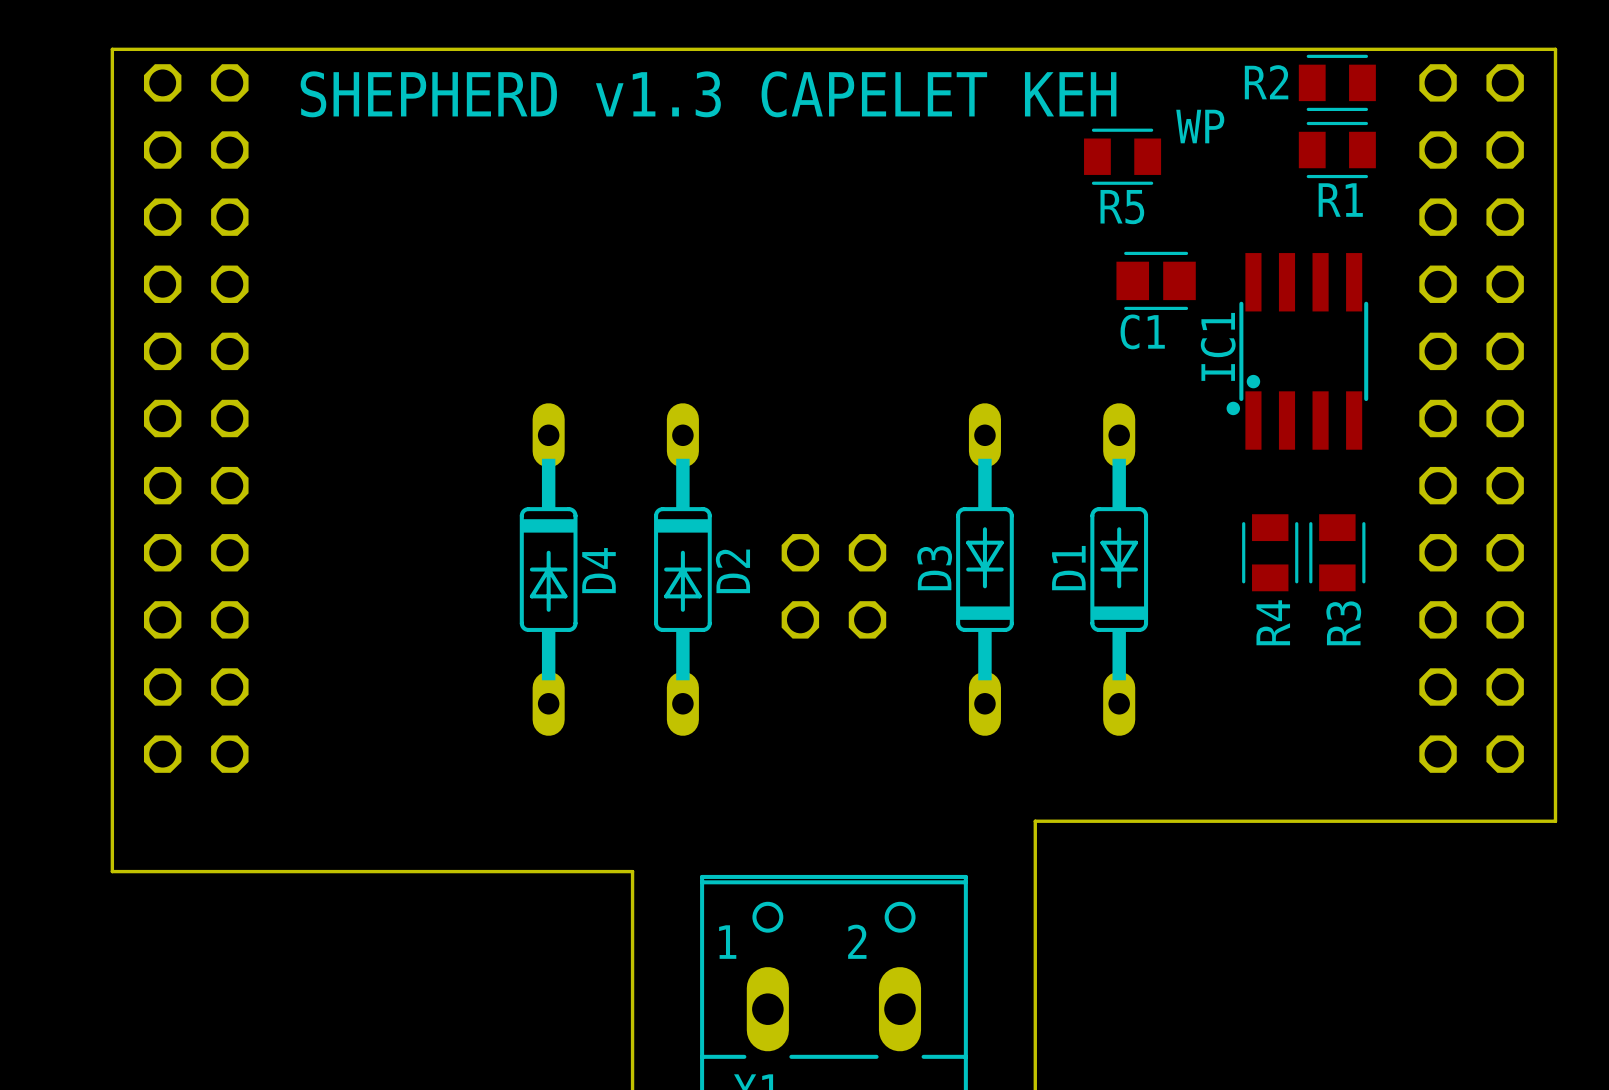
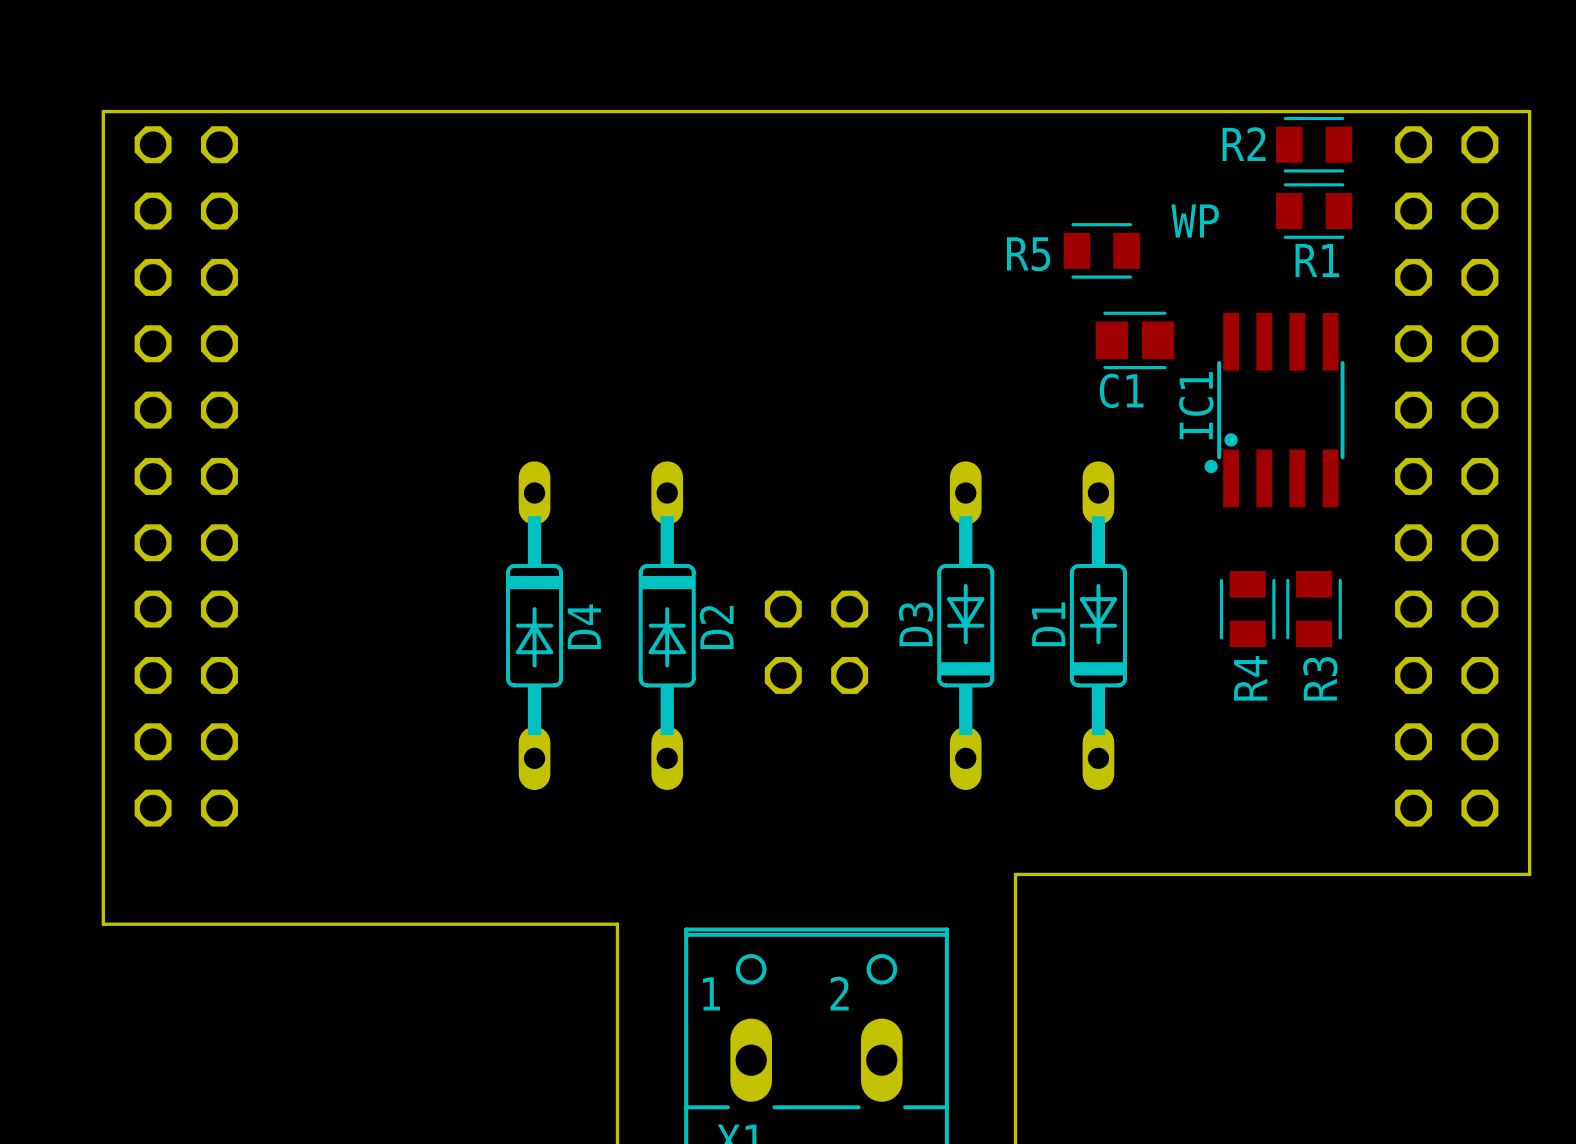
text: SHEPHERD v1.3 CAPELET KEH (708, 94) -> none
text position: WP (1200, 126) -> WP (1195, 221)
R5 position: (1122, 156) -> (1101, 250)
R5 name position: R5 (1122, 207) -> R5 (1028, 254)

